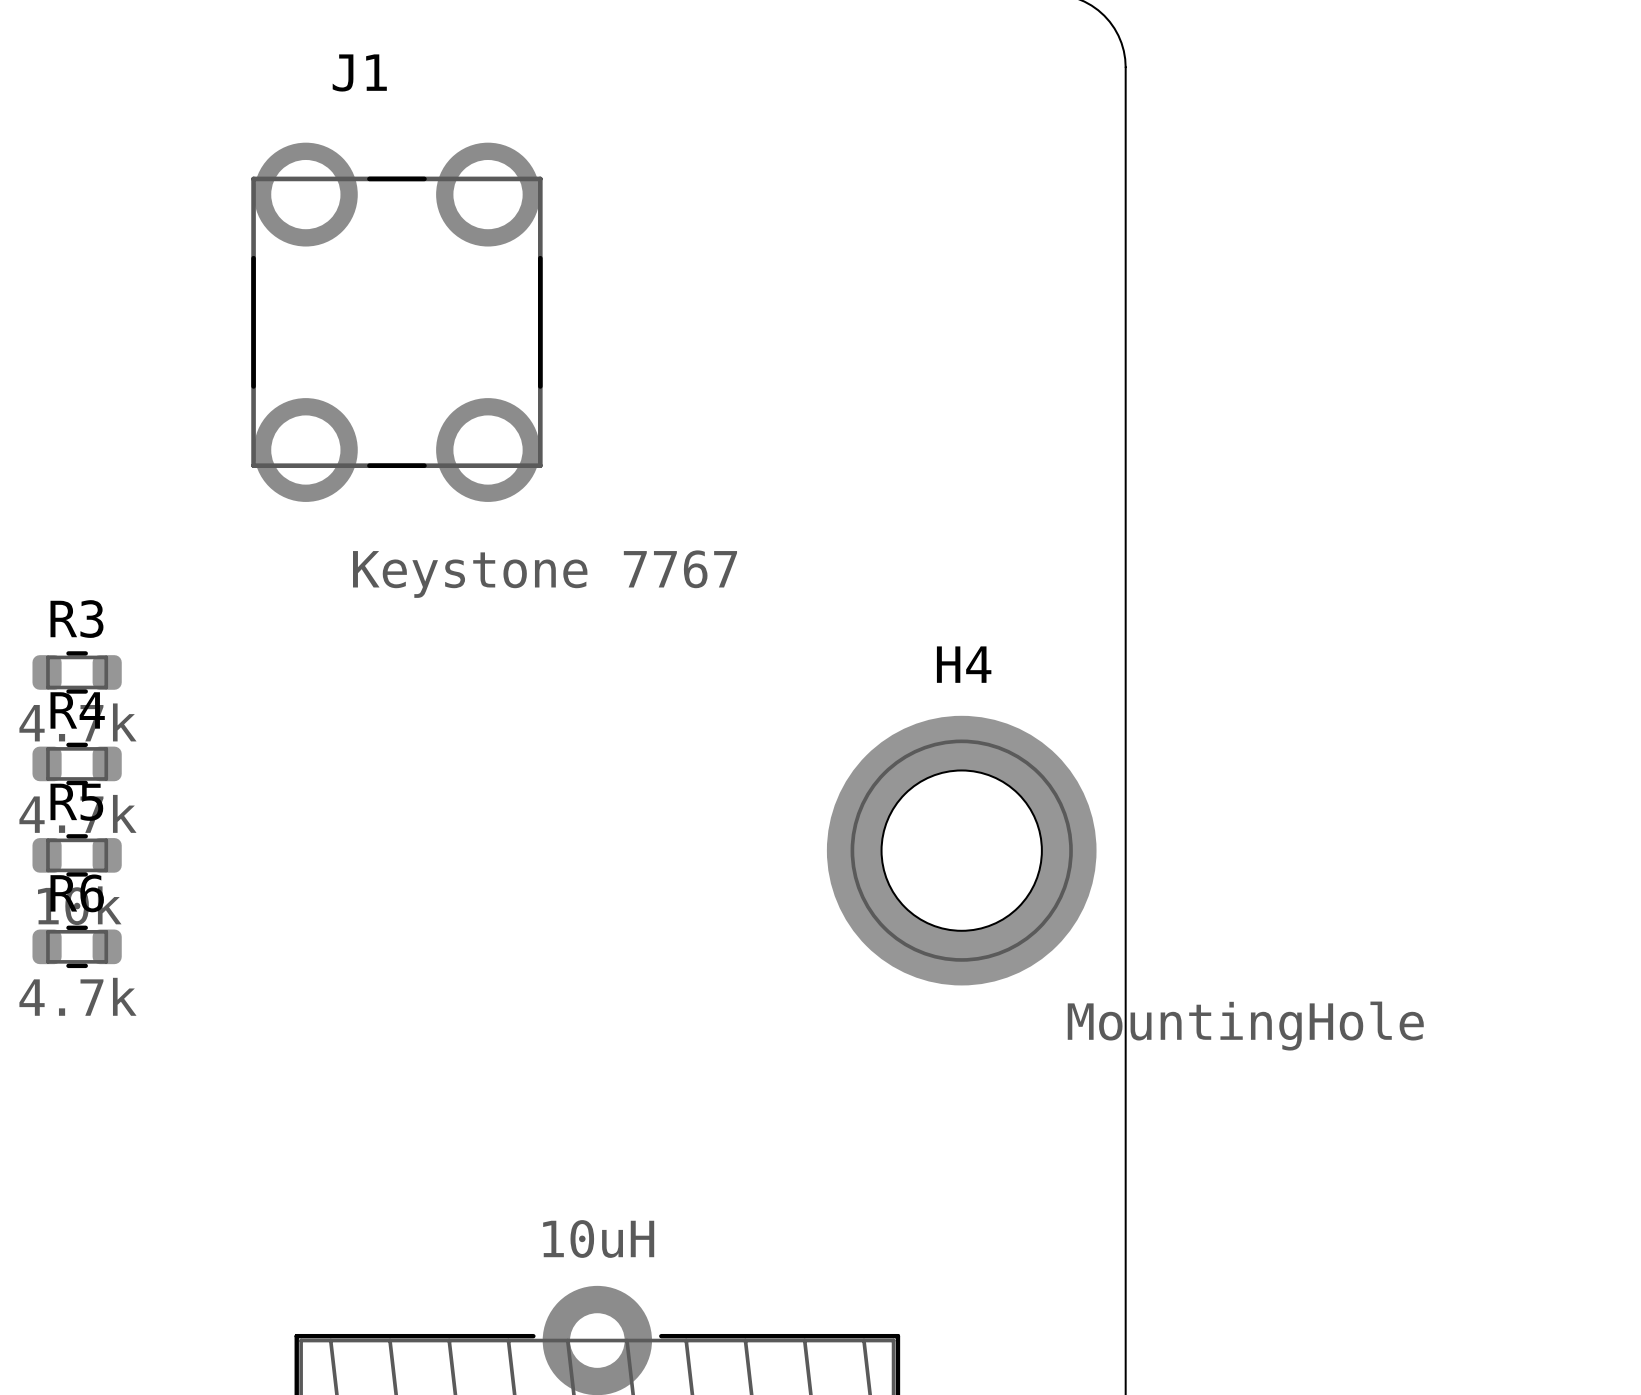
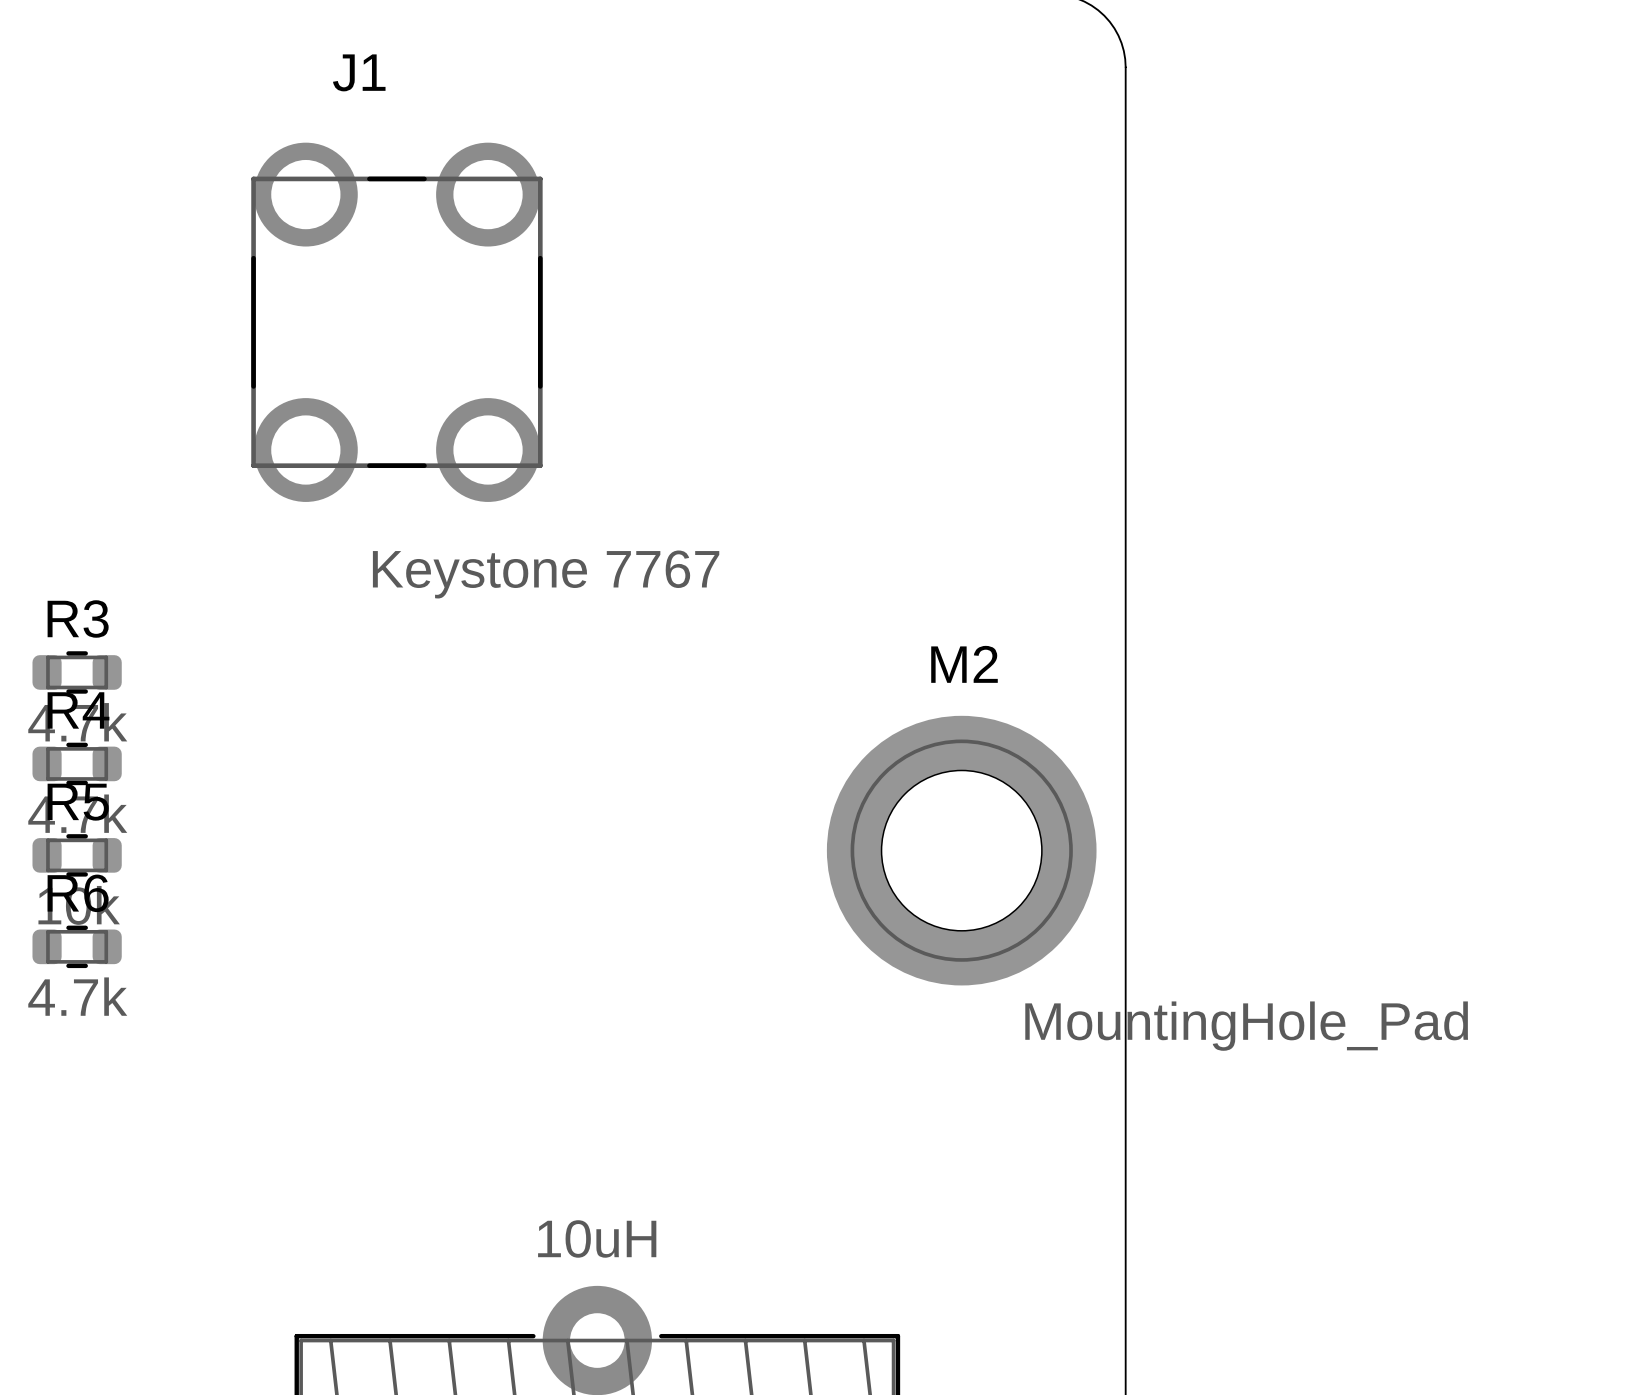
H4 name: H4 (964, 664) -> M2 (964, 664)
H4 value: MountingHole (1245, 1026) -> MountingHole_Pad (1246, 1026)

